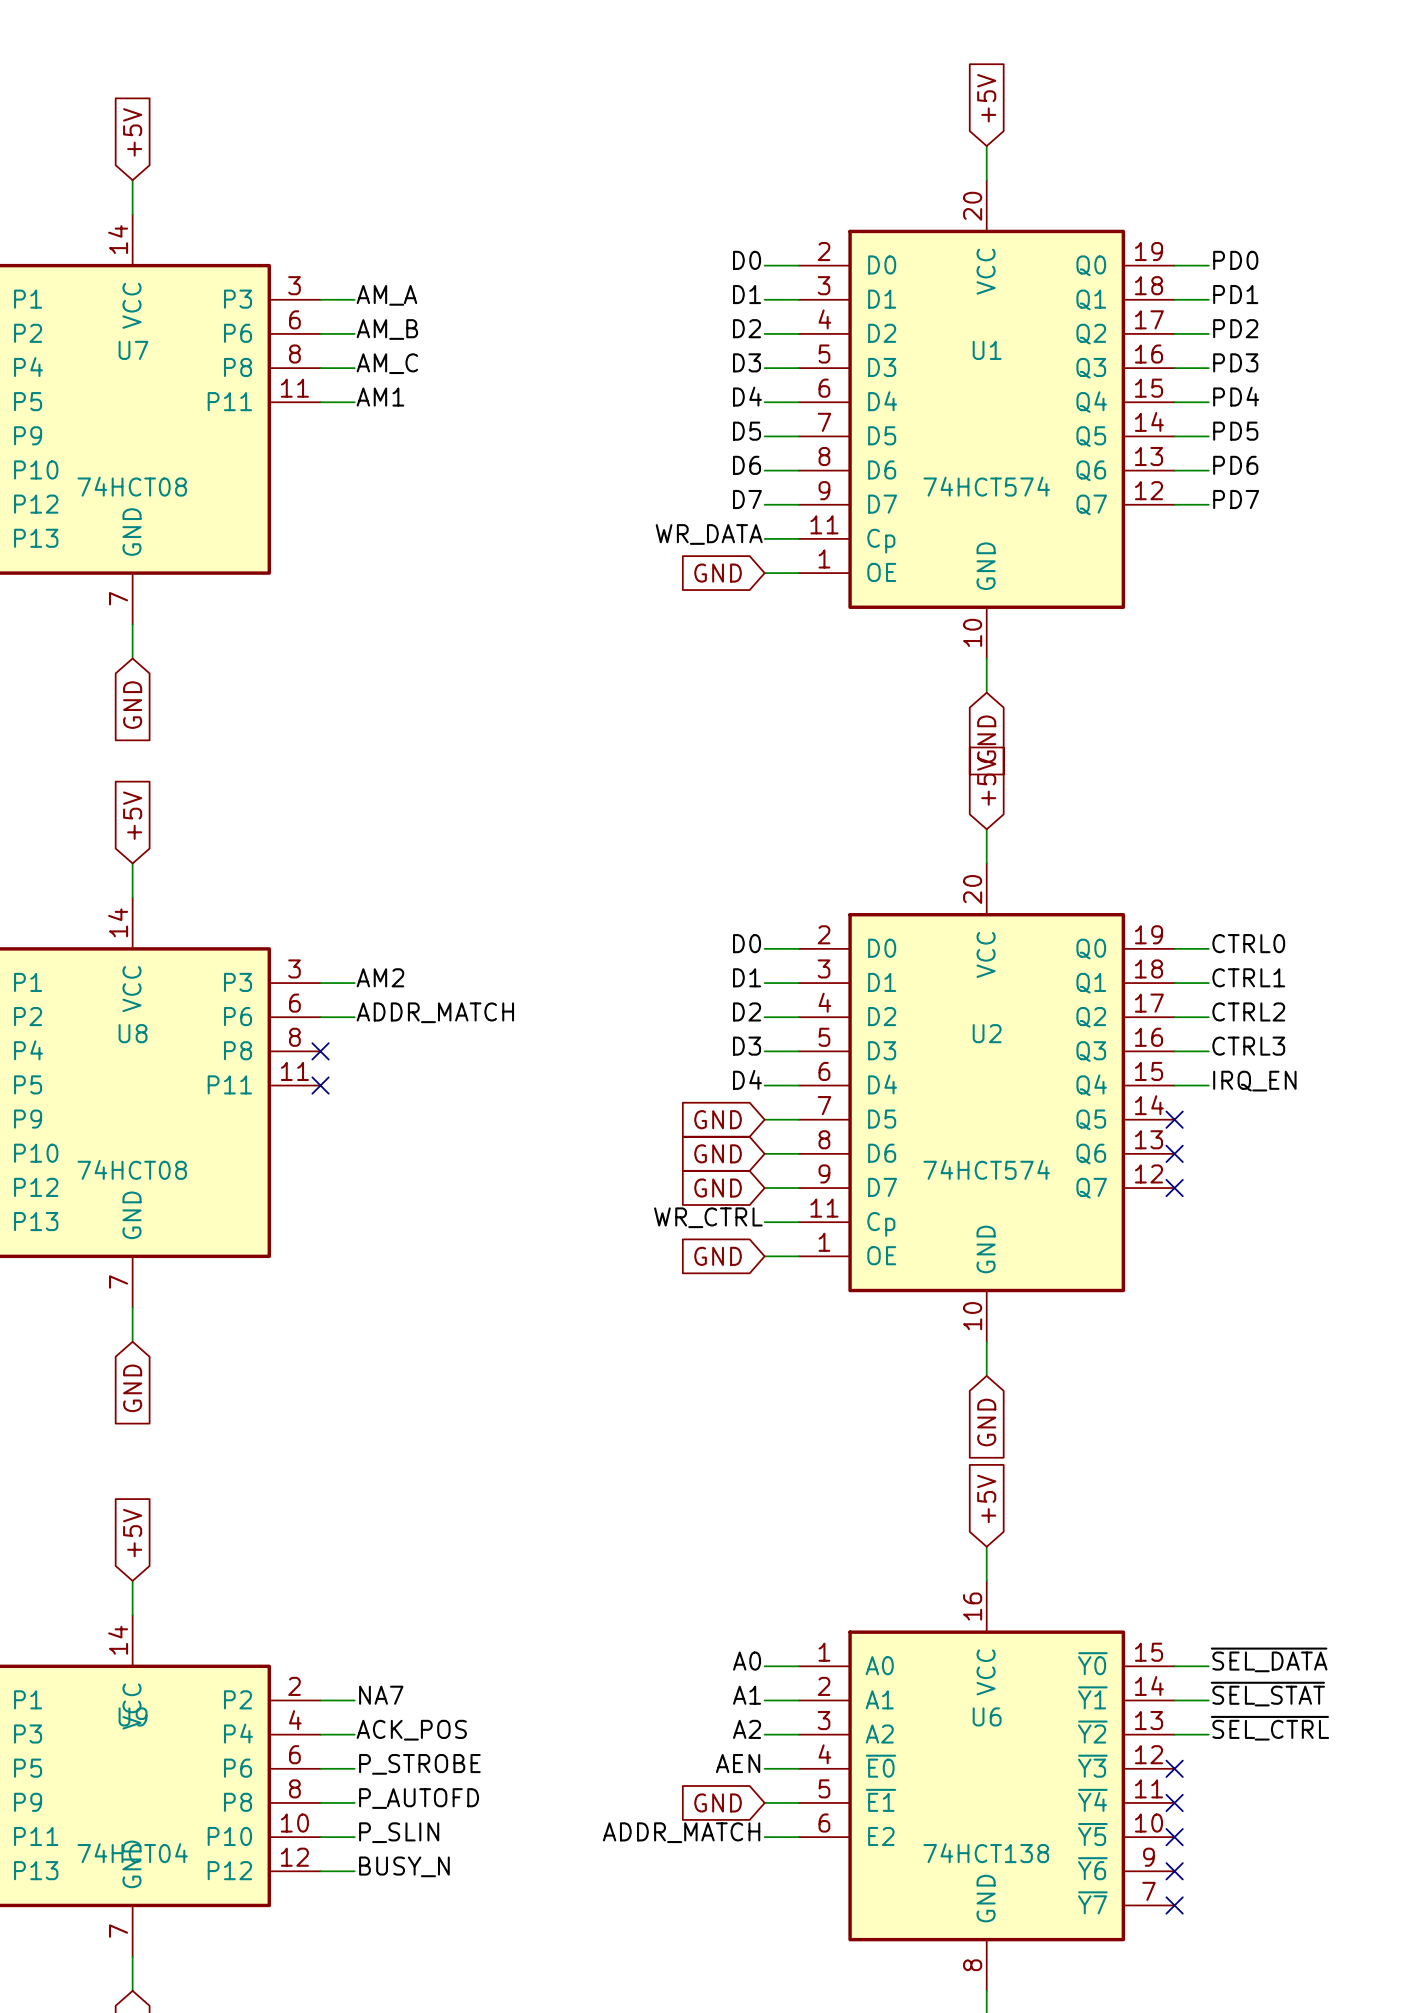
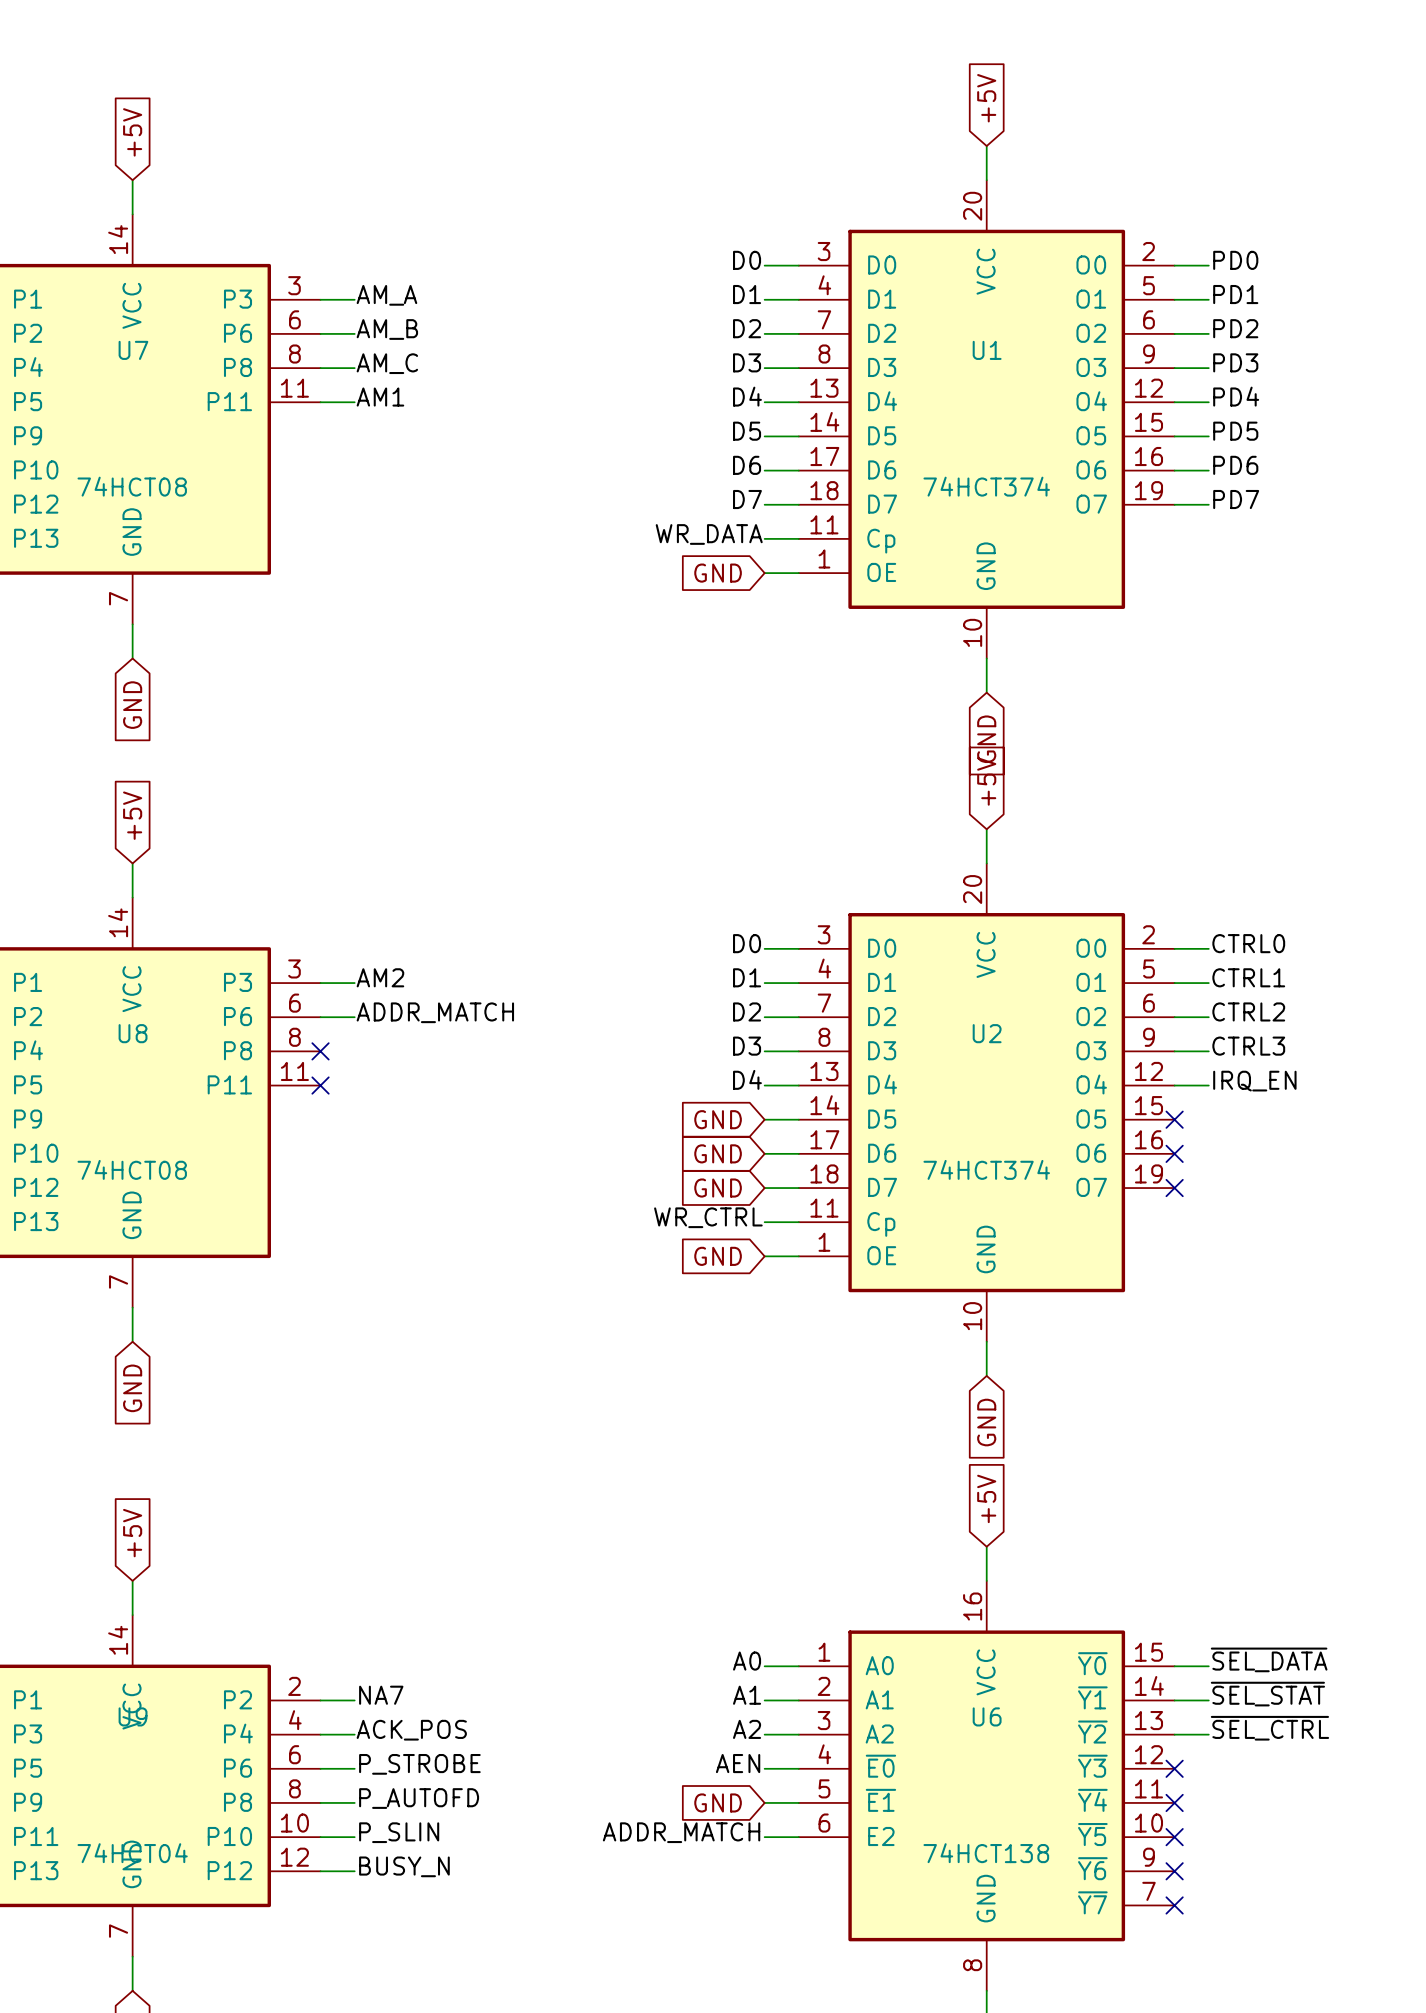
U1 symbol: [798, 180, 1175, 659] -> [798, 180, 1175, 659]
U1 value: 74HCT574 (986, 486) -> 74HCT374 (986, 486)
U2 symbol: [798, 863, 1175, 1342] -> [798, 863, 1175, 1342]
U2 value: 74HCT574 (986, 1169) -> 74HCT374 (986, 1169)

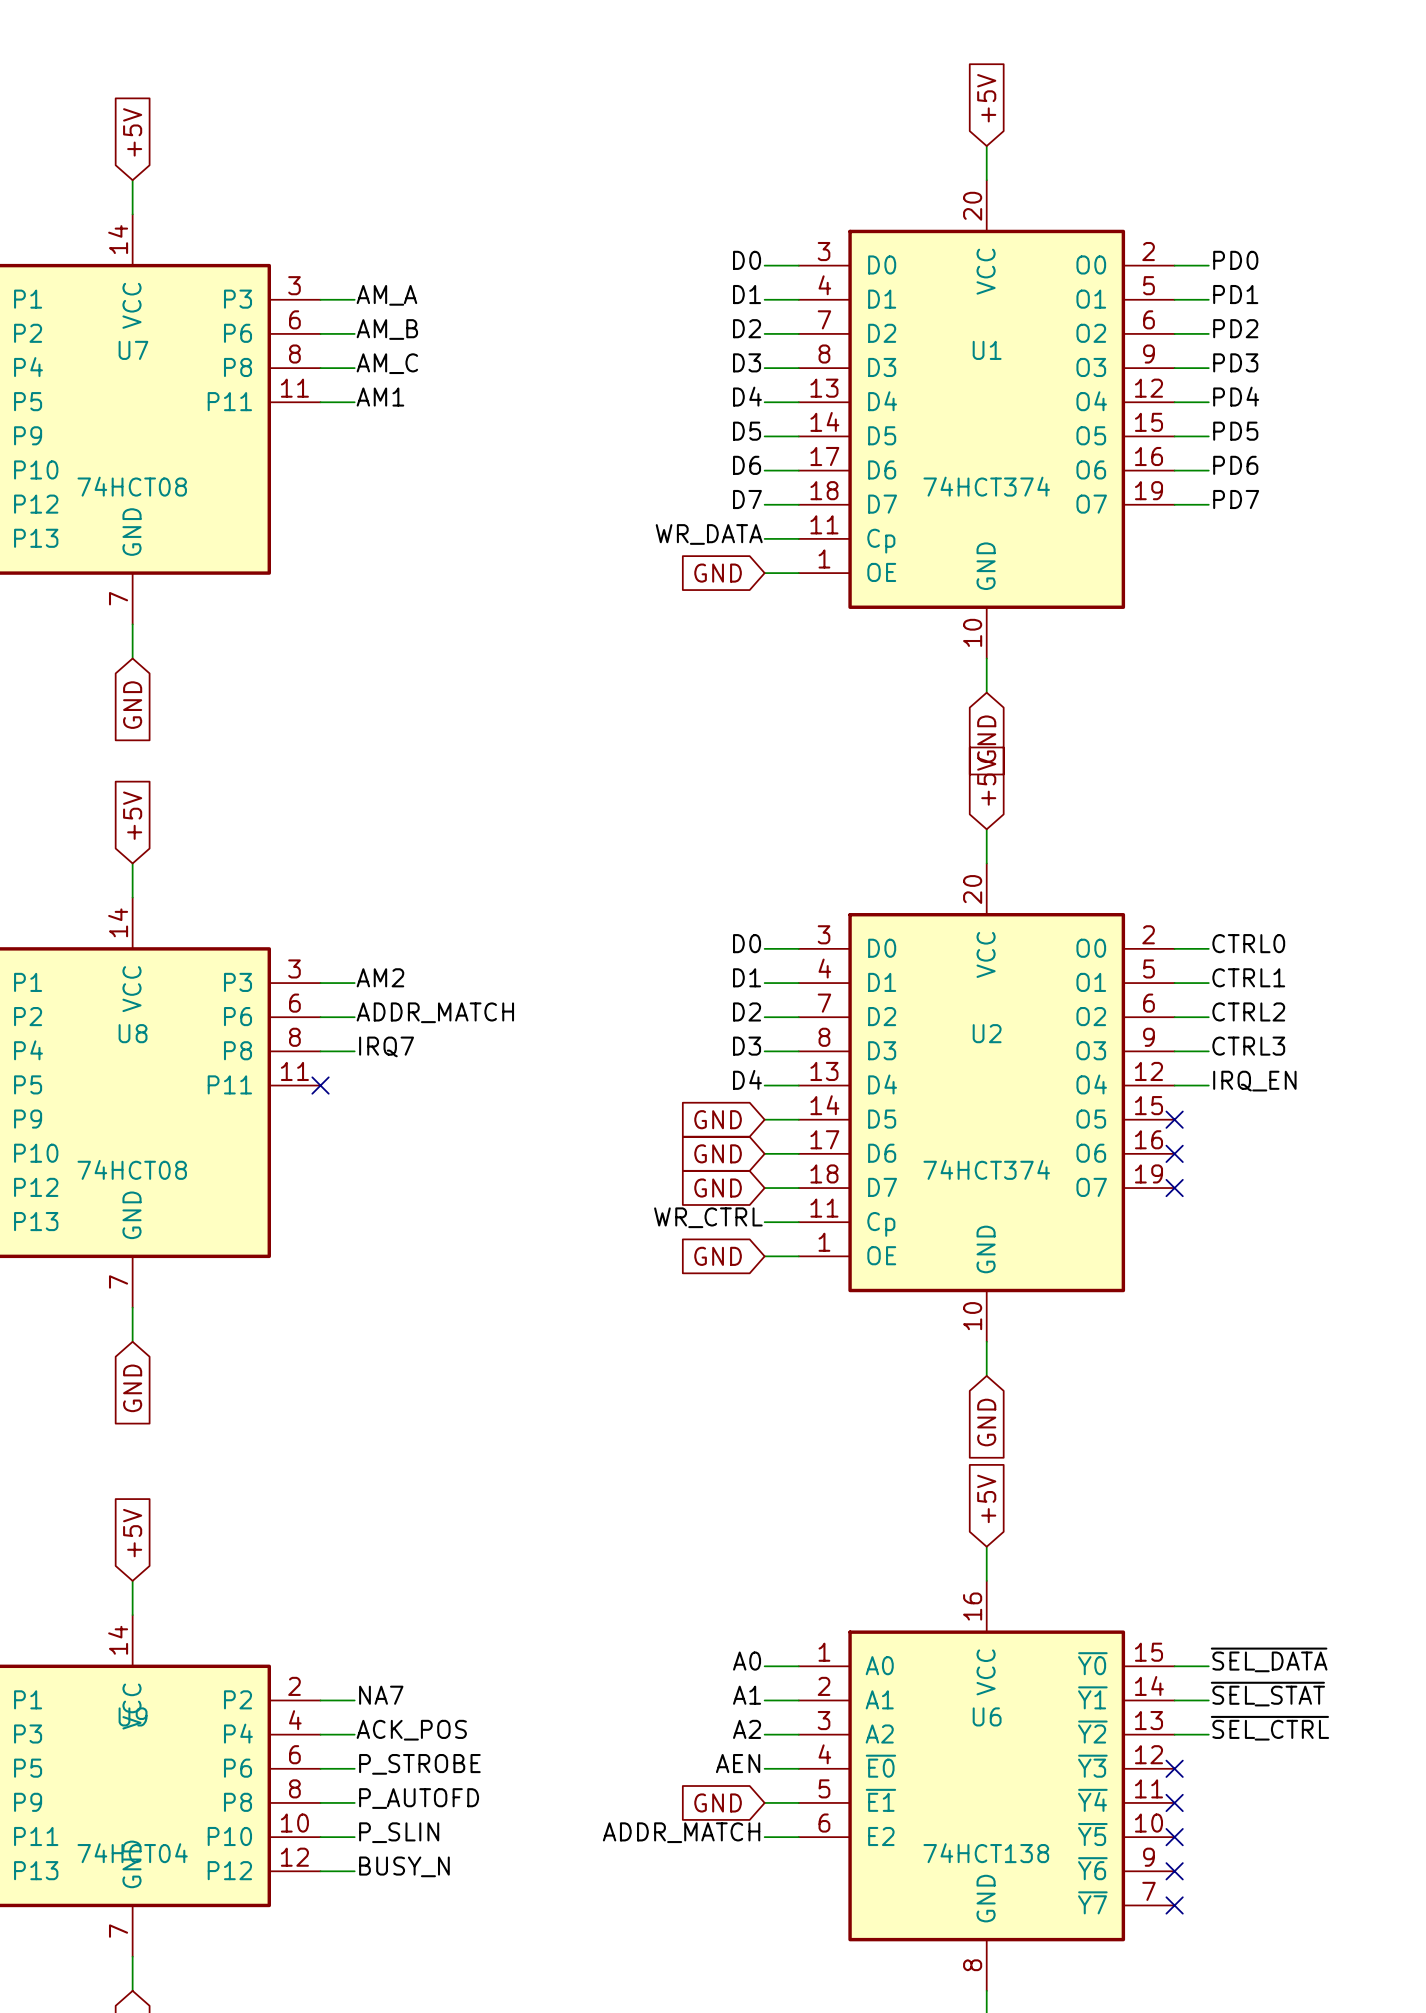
label: none -> IRQ7 (386, 1046)
wire: none -> (320, 1051) (354, 1051)
no-connect mark: (320, 1051) -> none

